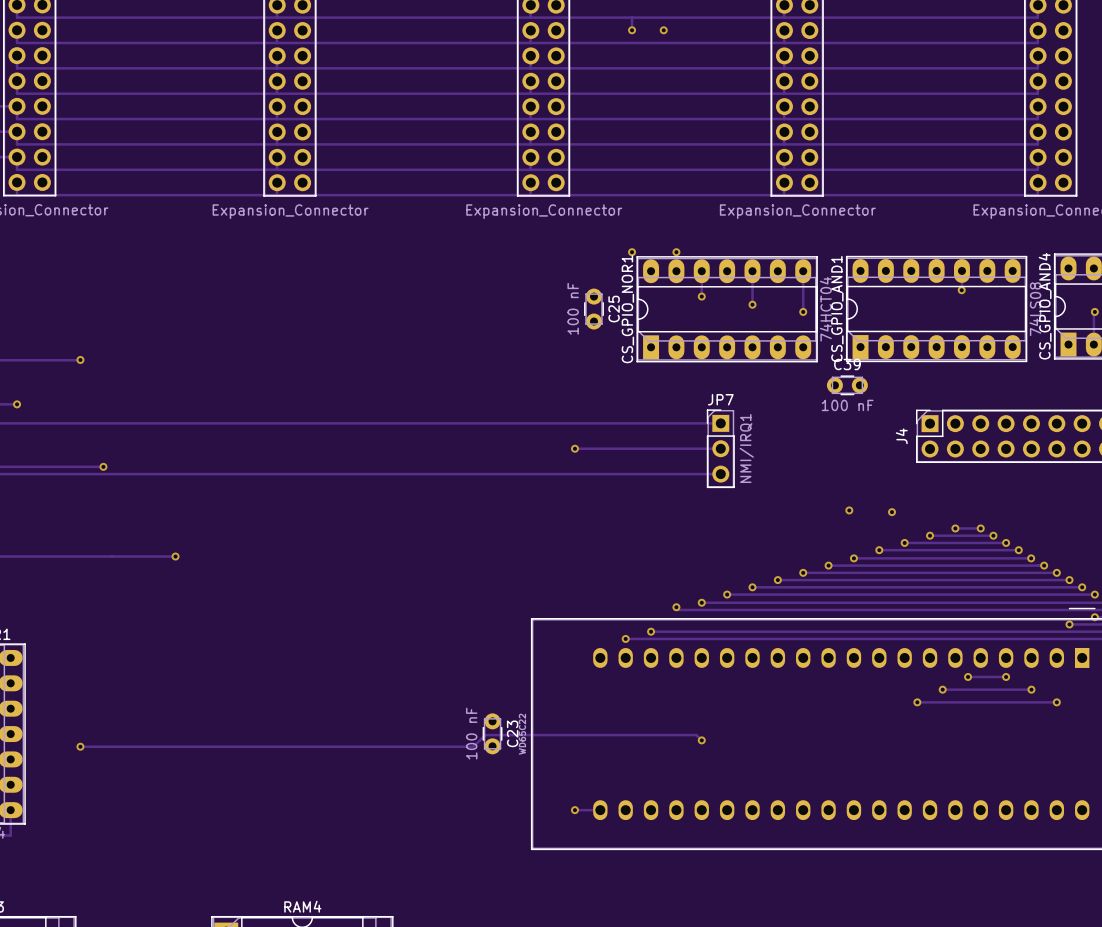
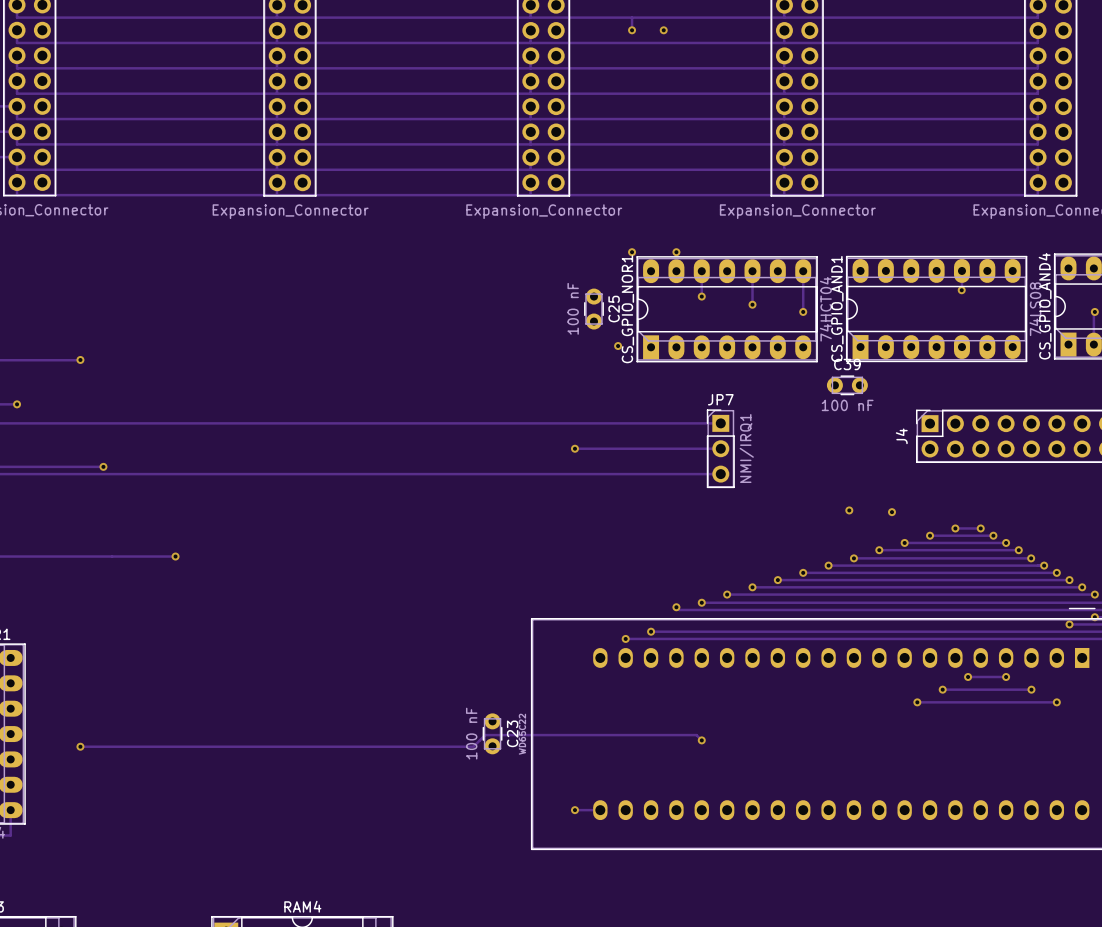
via: none -> (618, 346)

